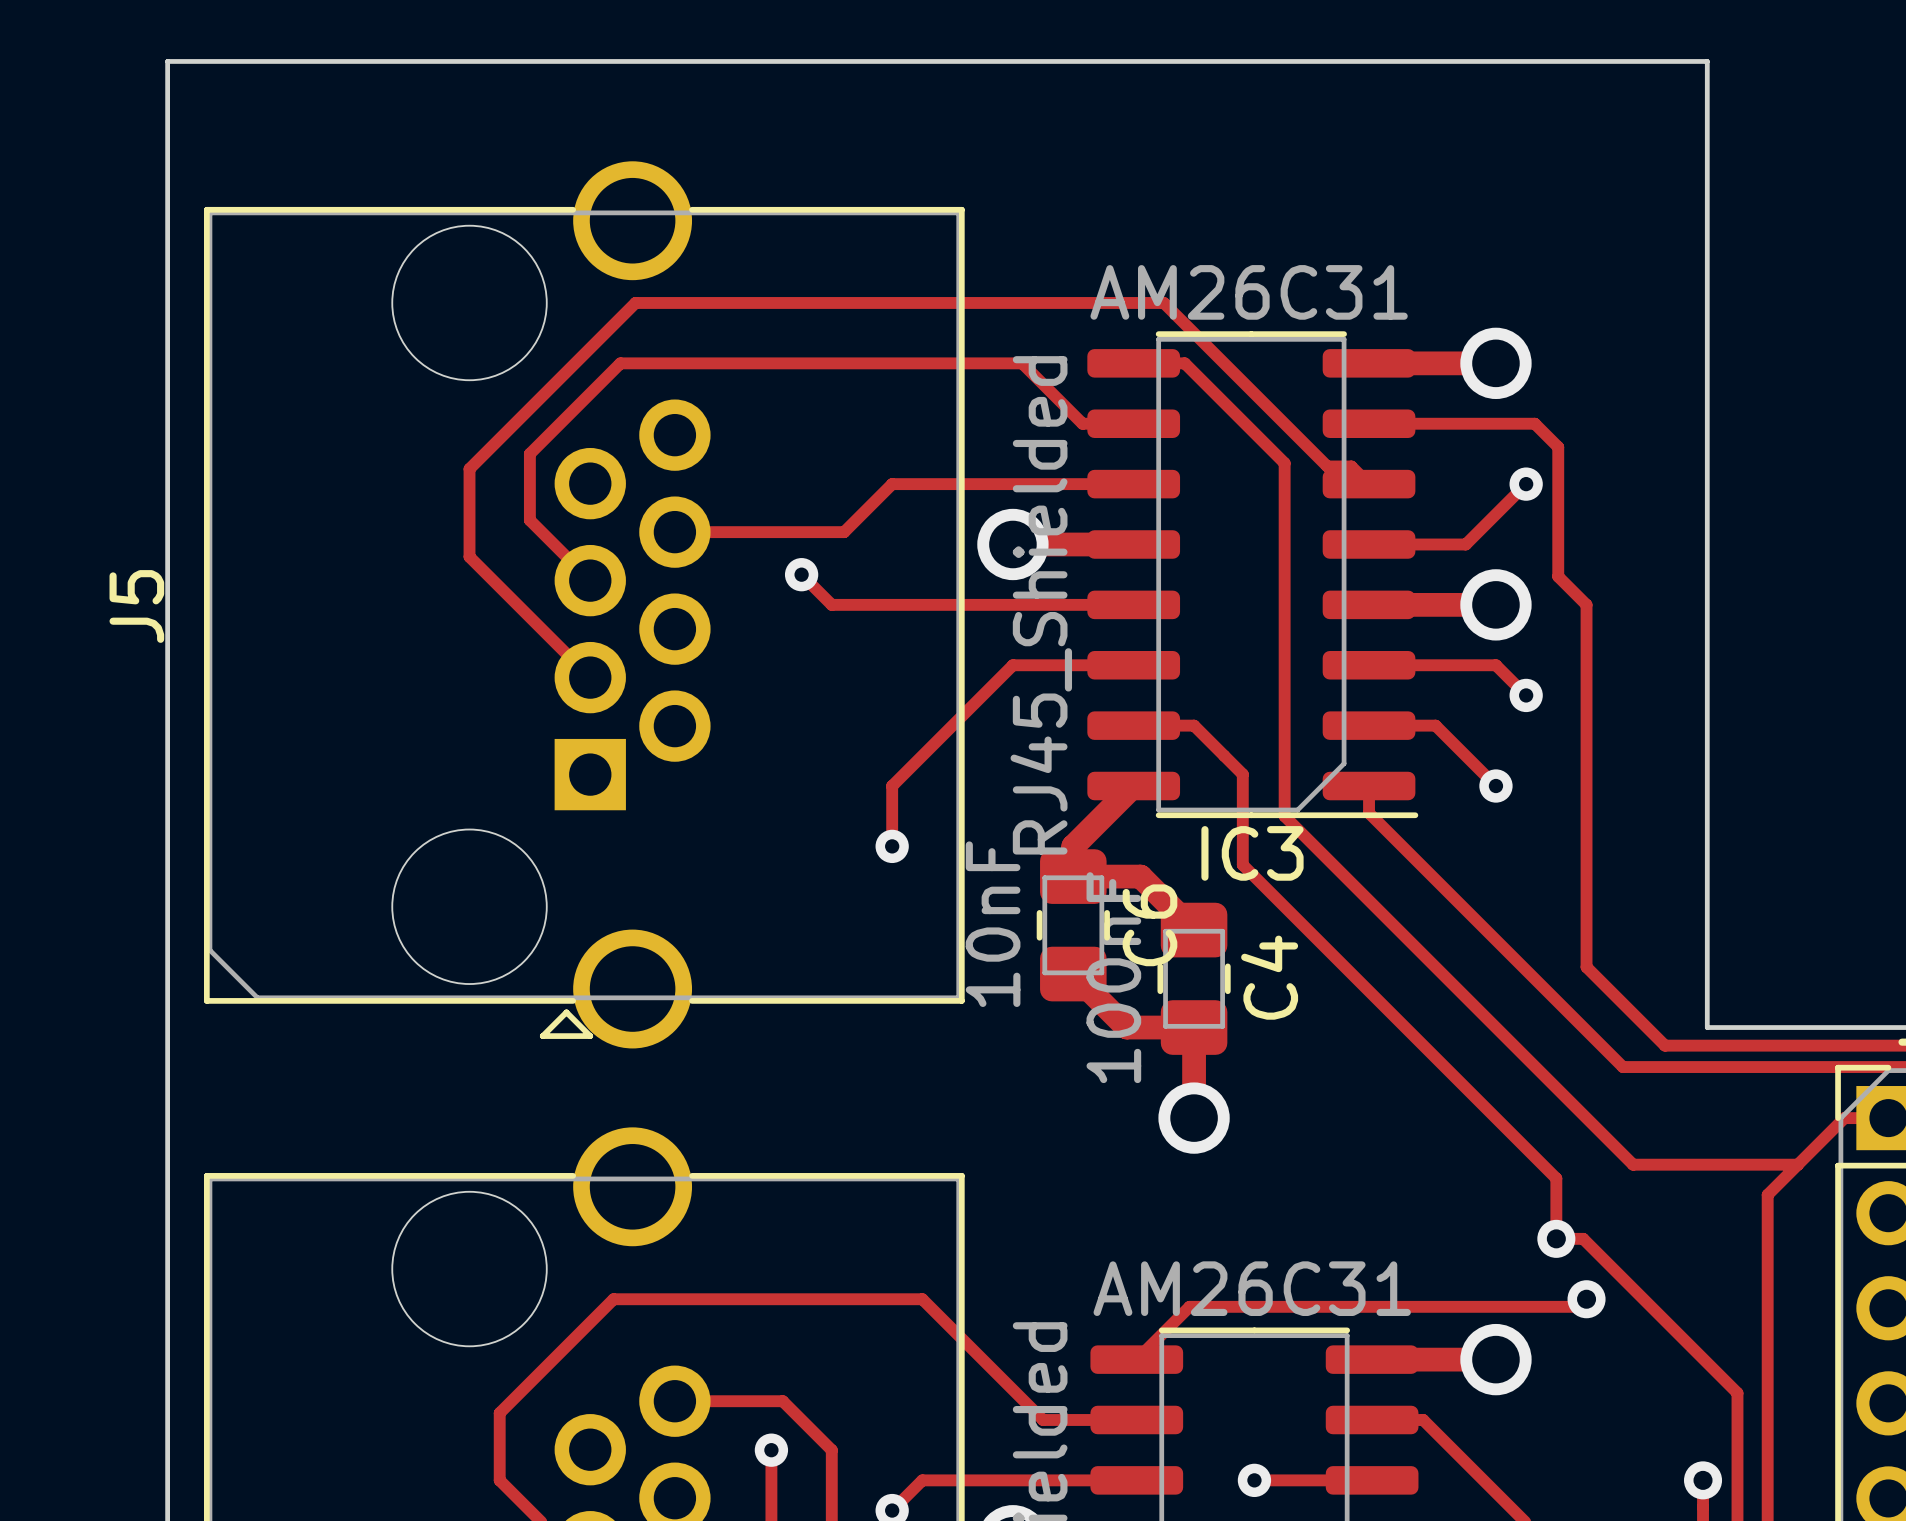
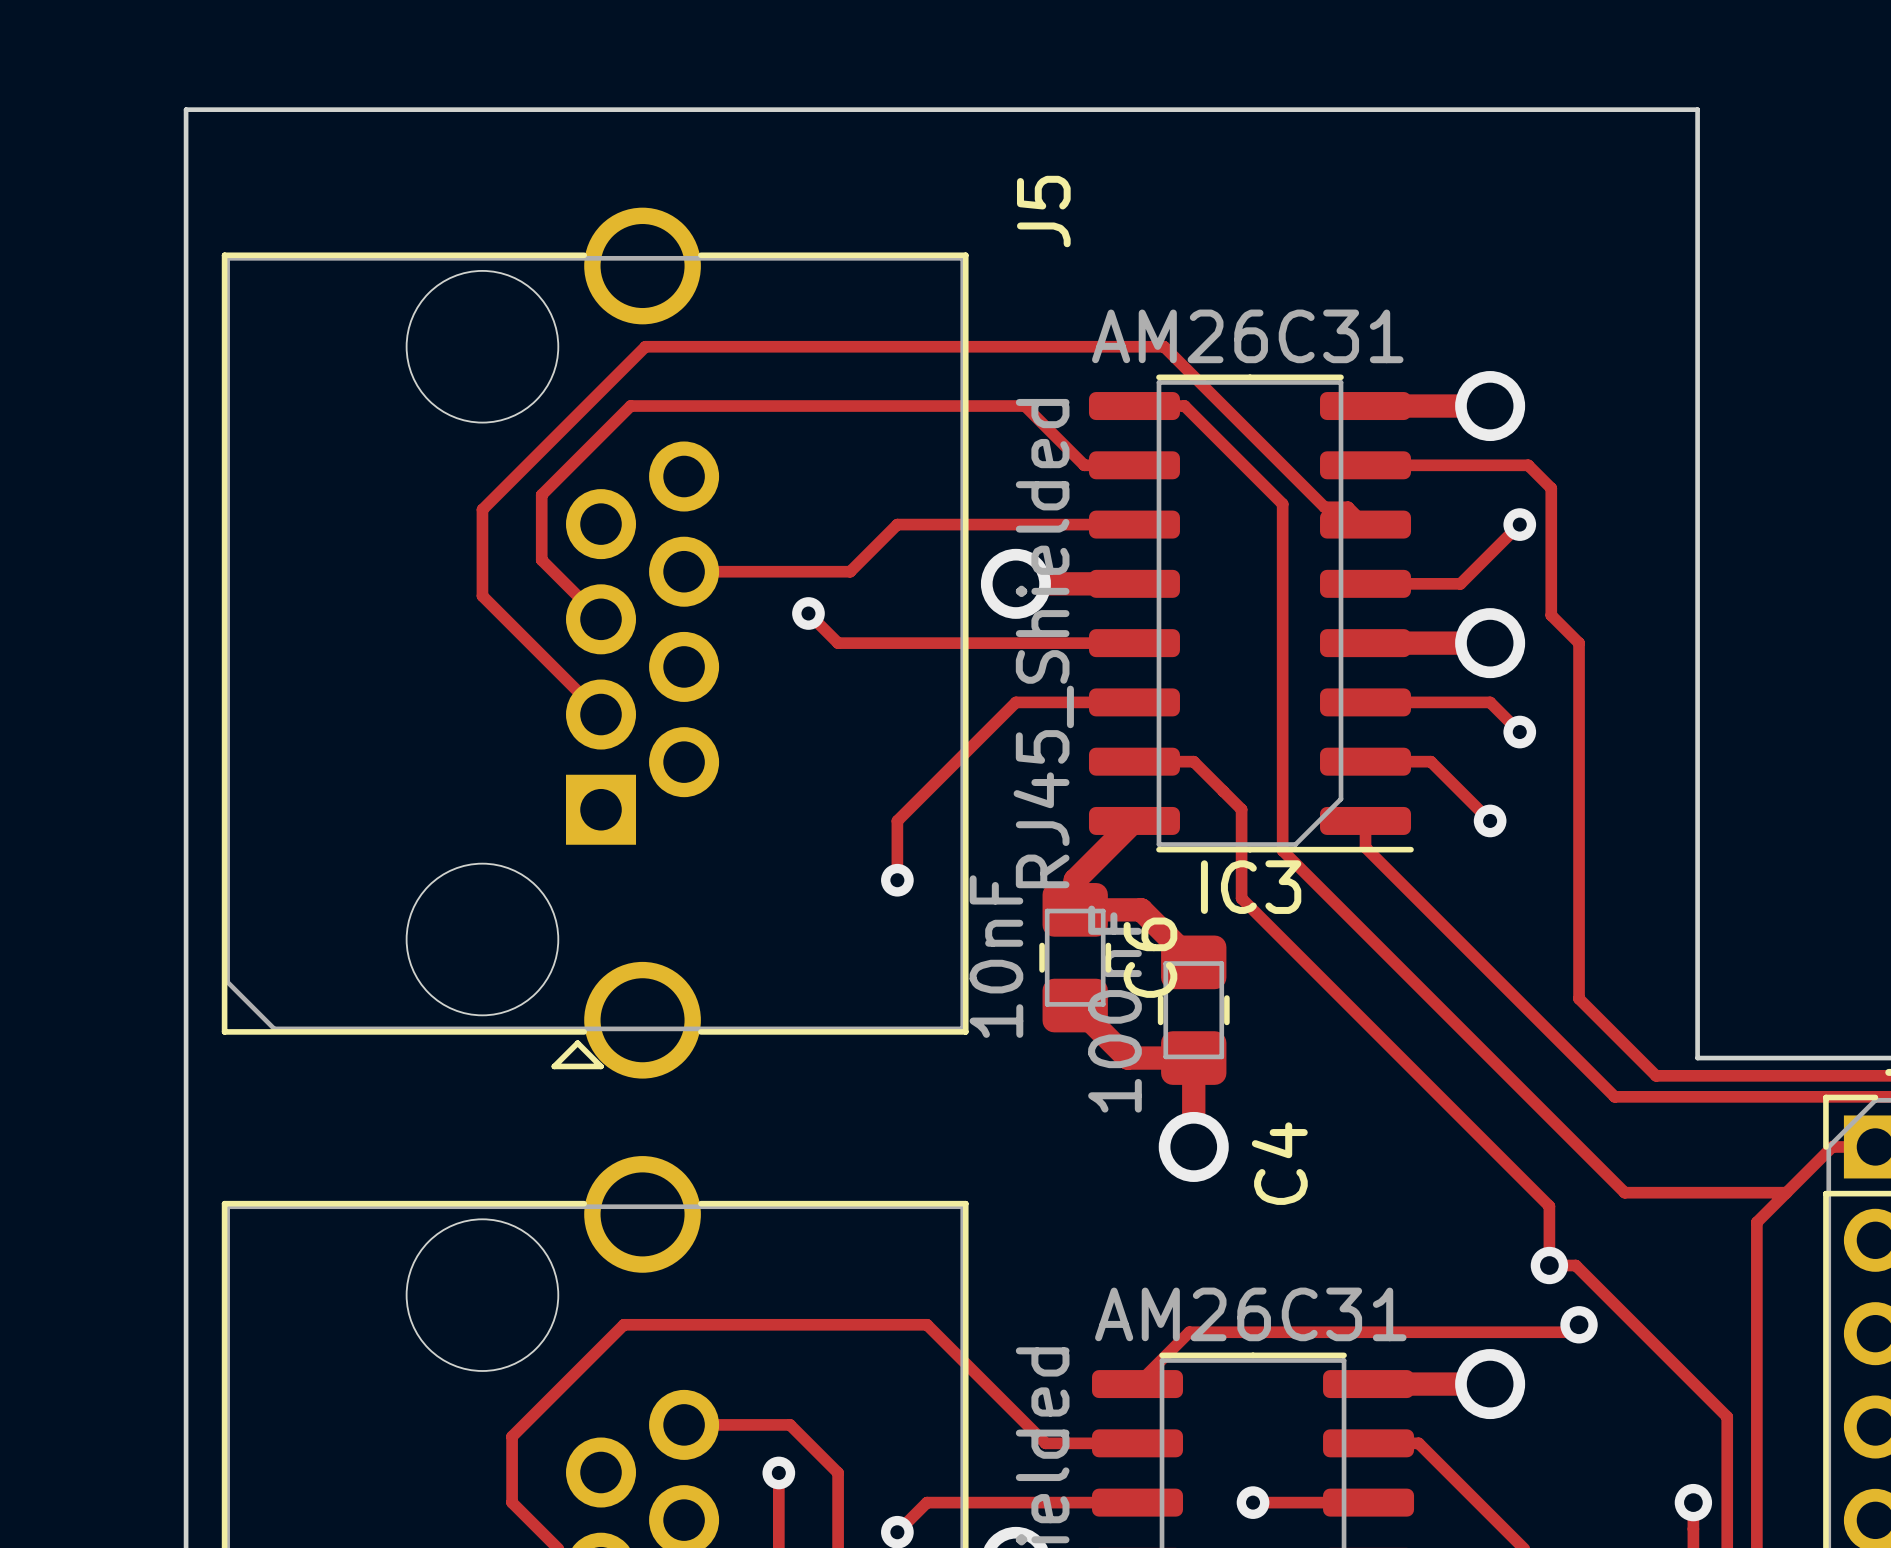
J5 name position: J5 (136, 606) -> J5 (1043, 211)
C4 name position: C4 (1269, 977) -> C4 (1279, 1163)

